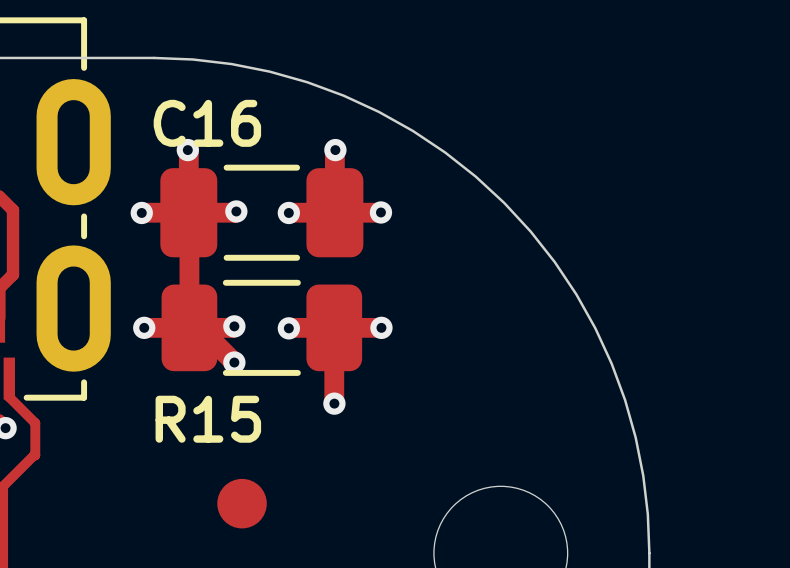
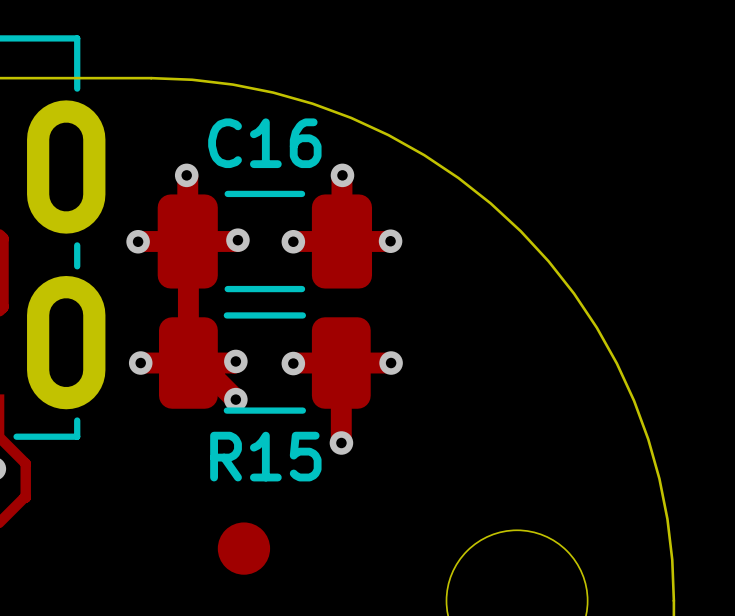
C16 name position: C16 (207, 123) -> C16 (264, 143)
R15 name position: R15 (208, 419) -> R15 (265, 456)

